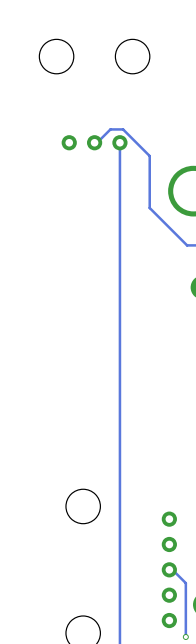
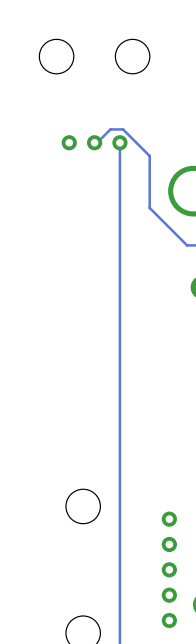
track: (169, 569) (172, 569) (185, 583) (185, 637) -> none
via: (185, 637) -> none

